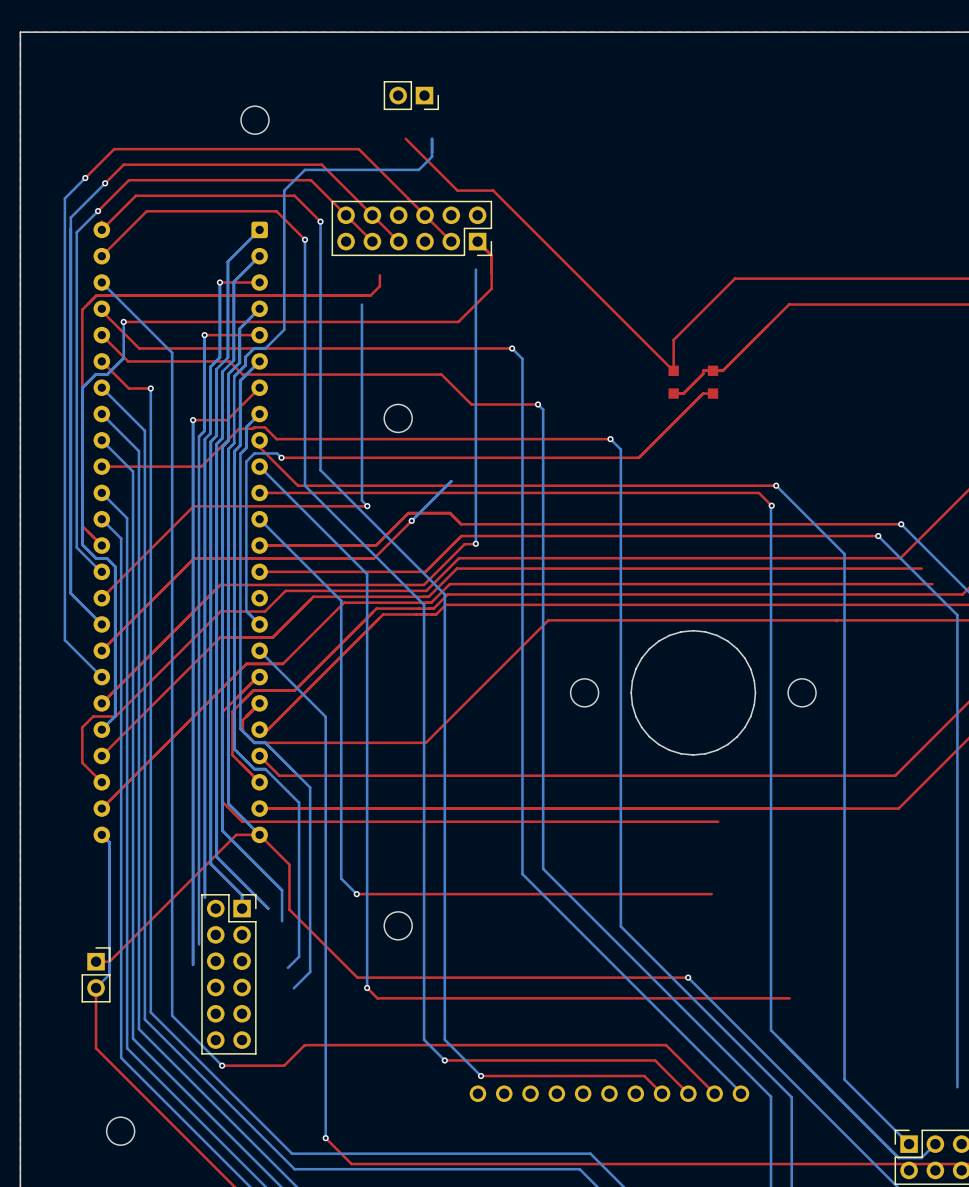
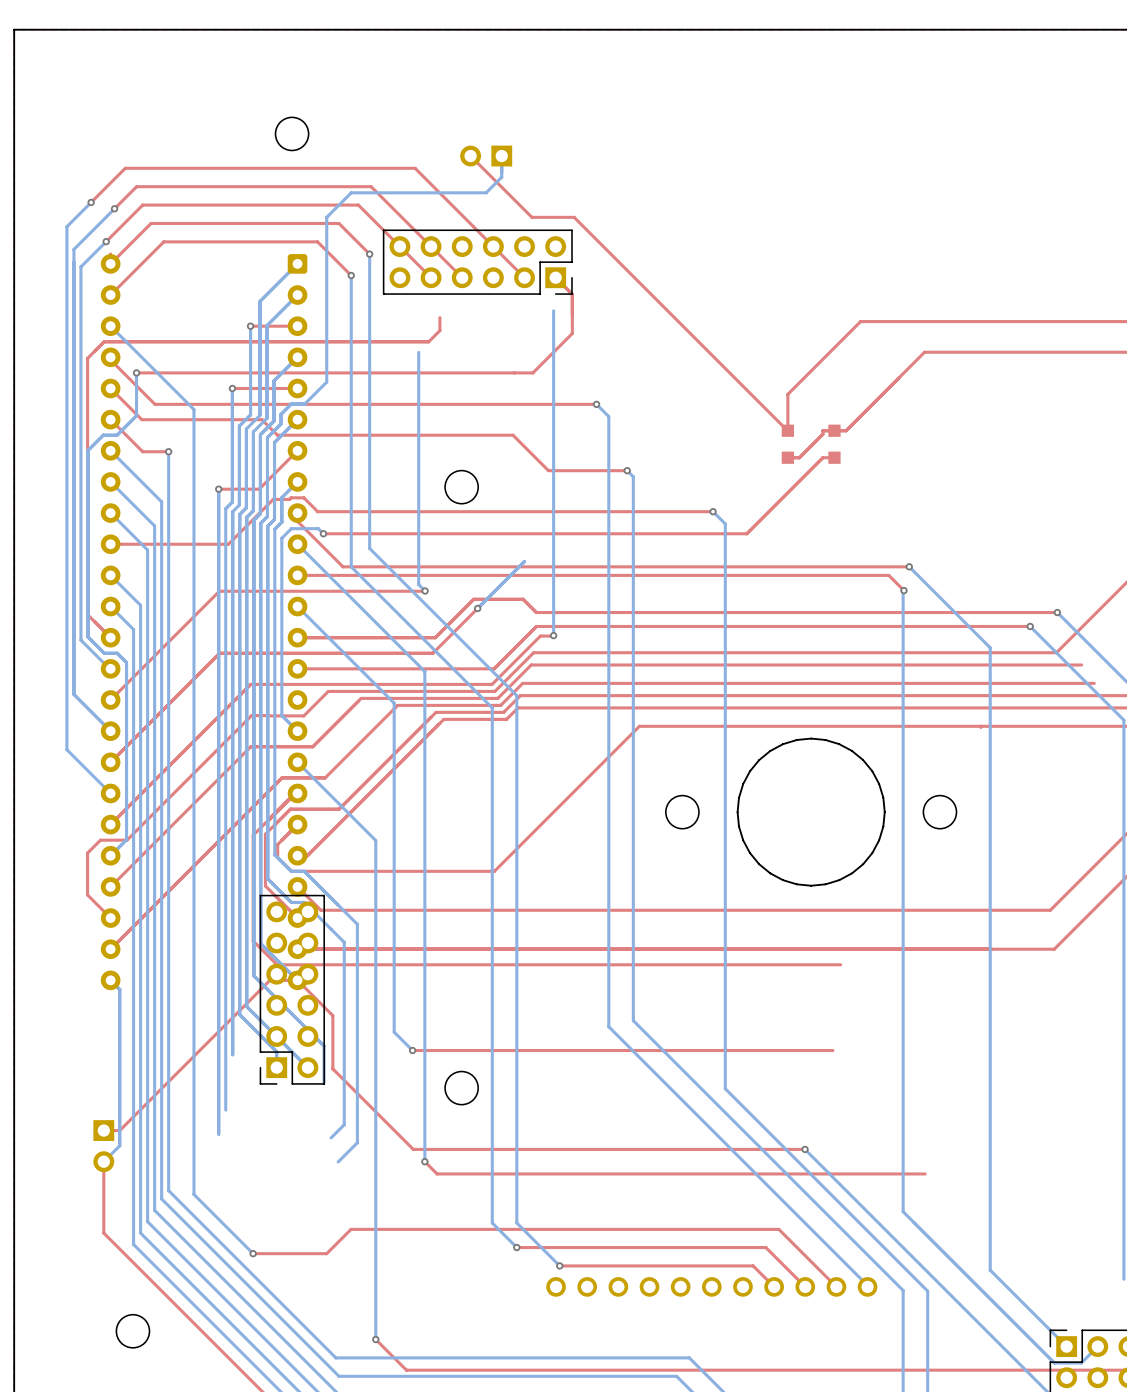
part side: bottom (411, 95) -> top (486, 156)
part side: bottom (96, 974) -> top (103, 1146)
part rotation: 0° (228, 974) -> 180° (292, 989)
part position: (228, 974) -> (292, 989)

